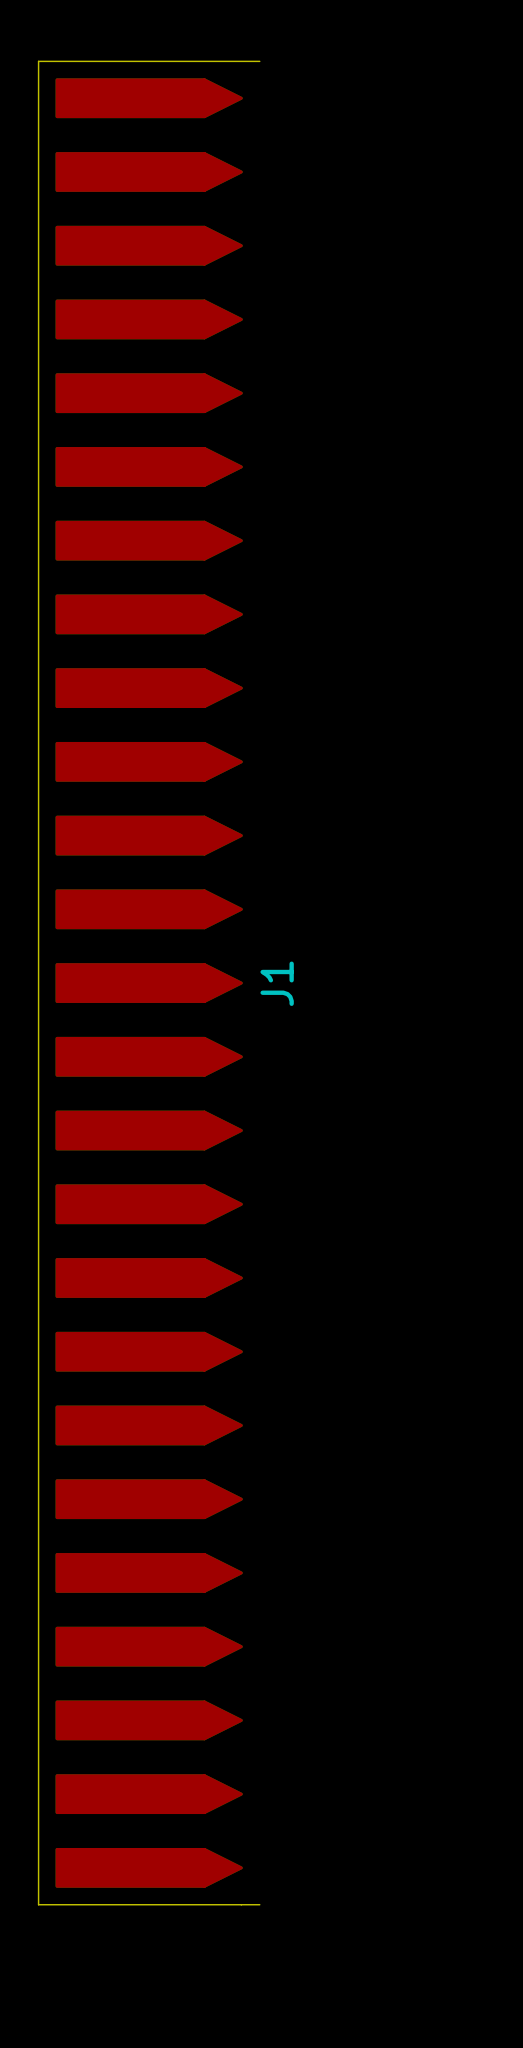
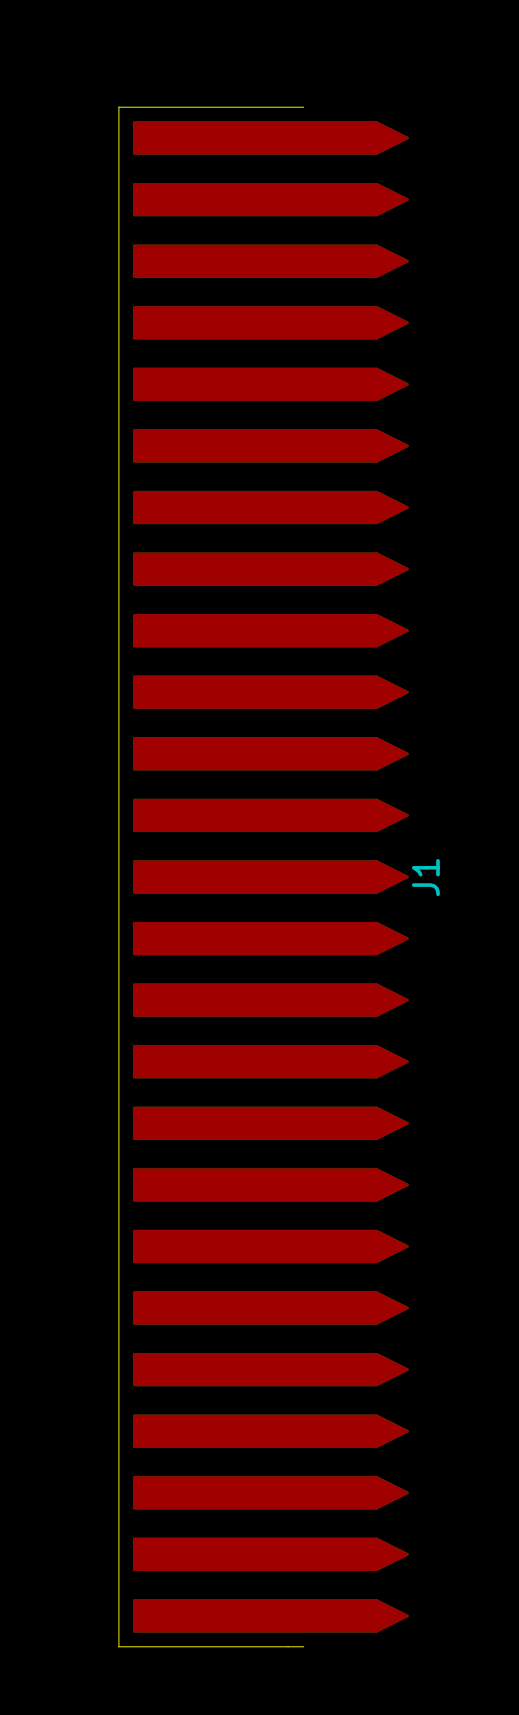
J1 footprint: [55, 78, 243, 1888] -> [133, 121, 409, 1633]

